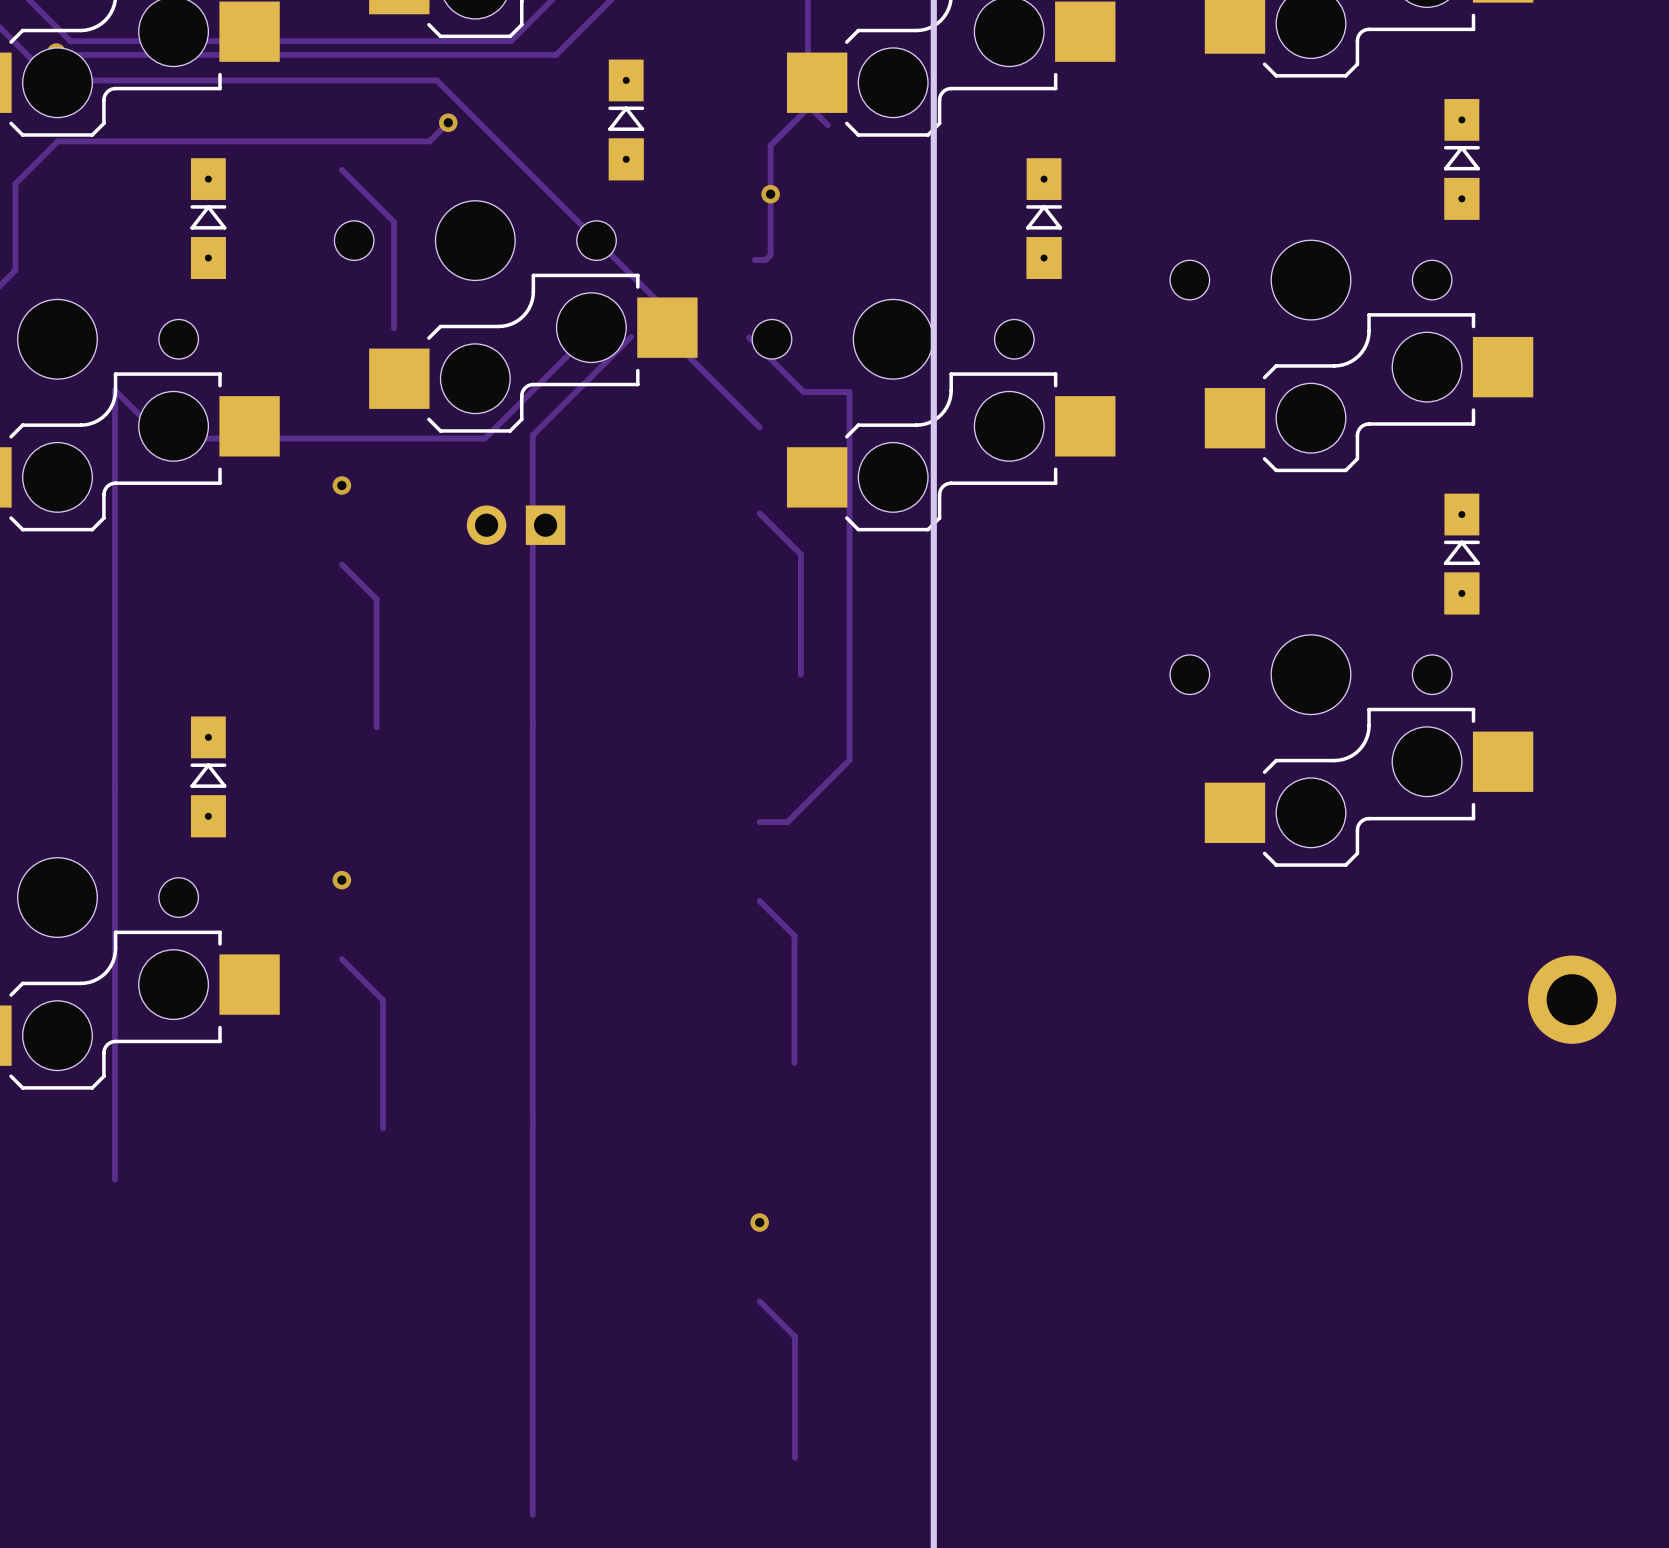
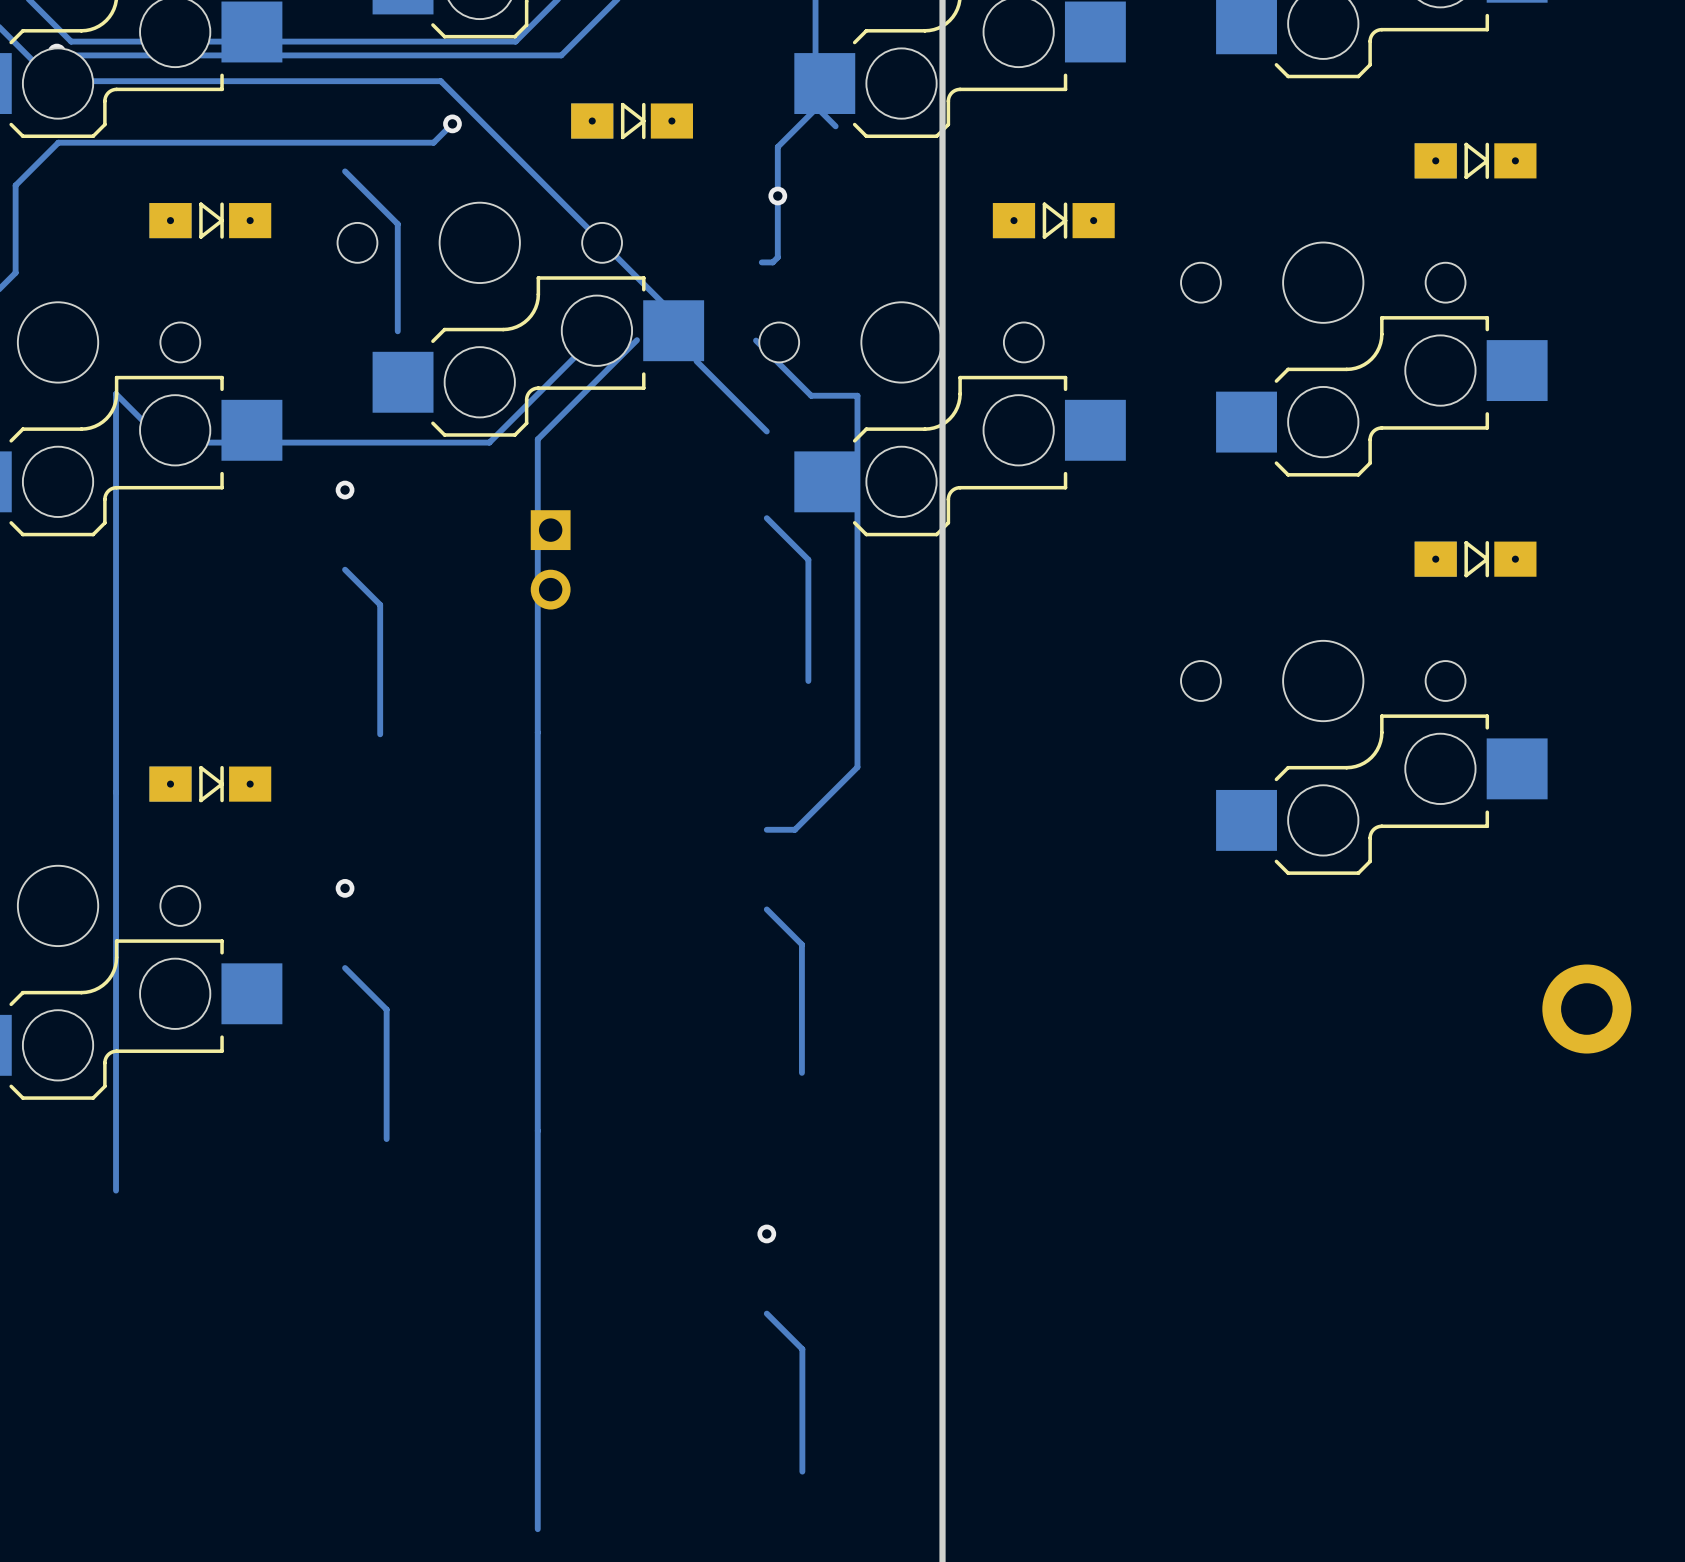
part rotation: 0° (626, 119) -> 90° clockwise (632, 121)
part rotation: 0° (1461, 159) -> 90° clockwise (1475, 160)
part rotation: 0° (208, 218) -> 90° clockwise (210, 220)
part rotation: 0° (1044, 218) -> 90° clockwise (1053, 220)
part rotation: 0° (516, 525) -> 90° counterclockwise (550, 559)
part rotation: 0° (1461, 553) -> 90° clockwise (1475, 559)
part rotation: 0° (208, 776) -> 90° clockwise (210, 784)

